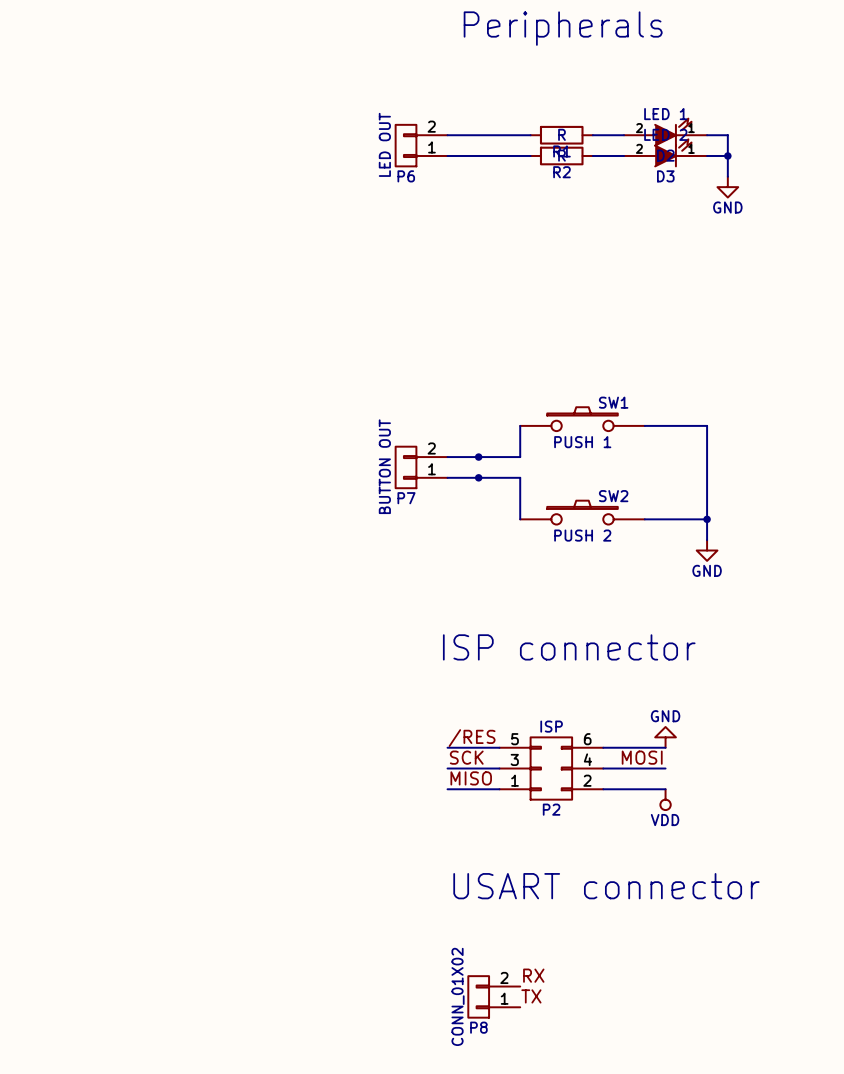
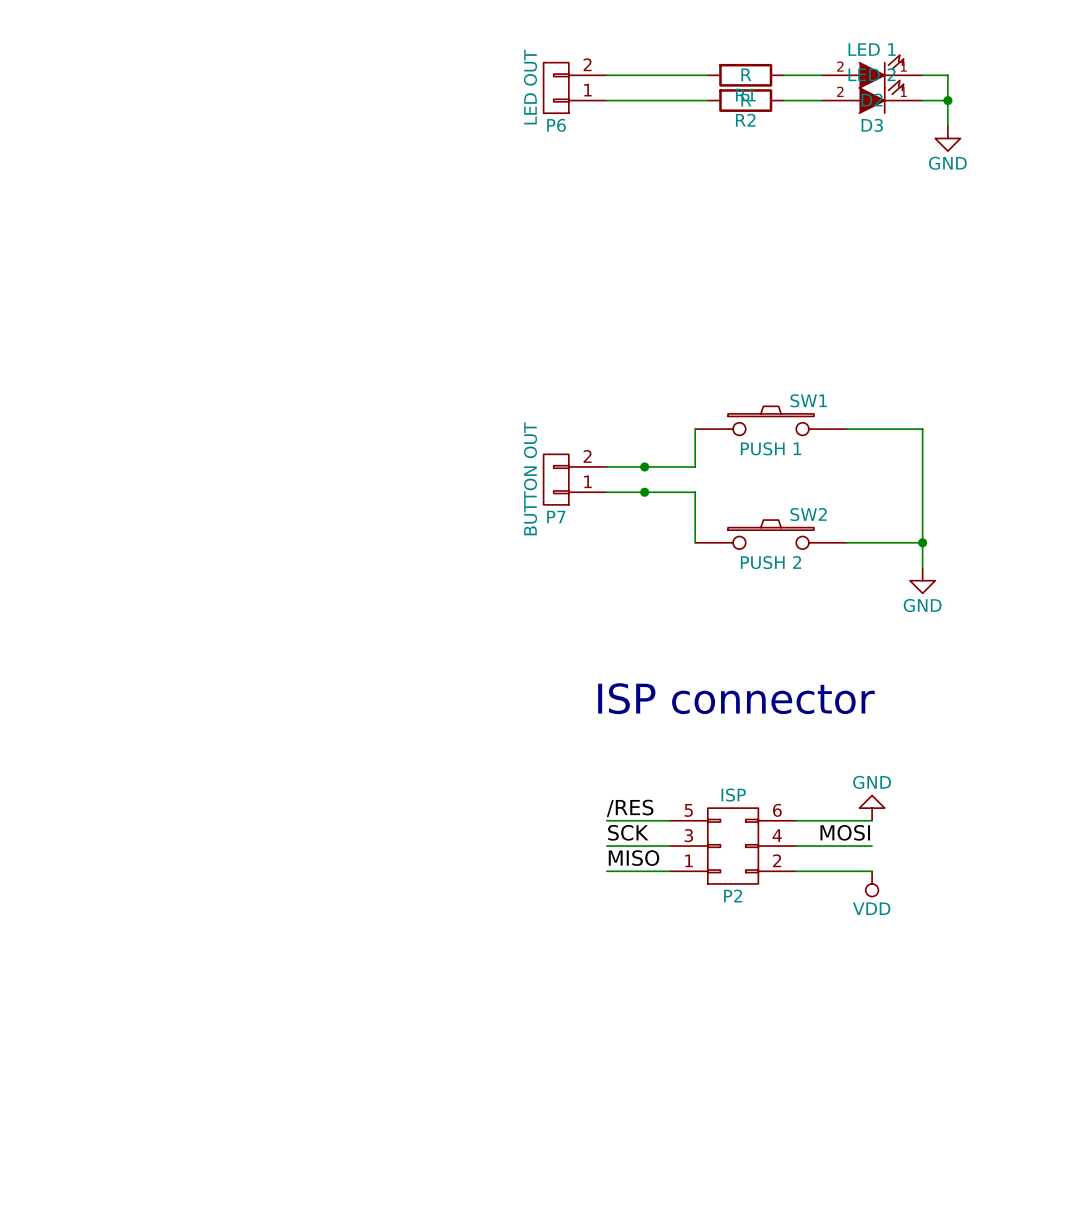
text: USART connector (606, 886) -> none
label: RX (533, 975) -> none
P8: CONN_01X02 (494, 996) -> none
label: TX (531, 996) -> none

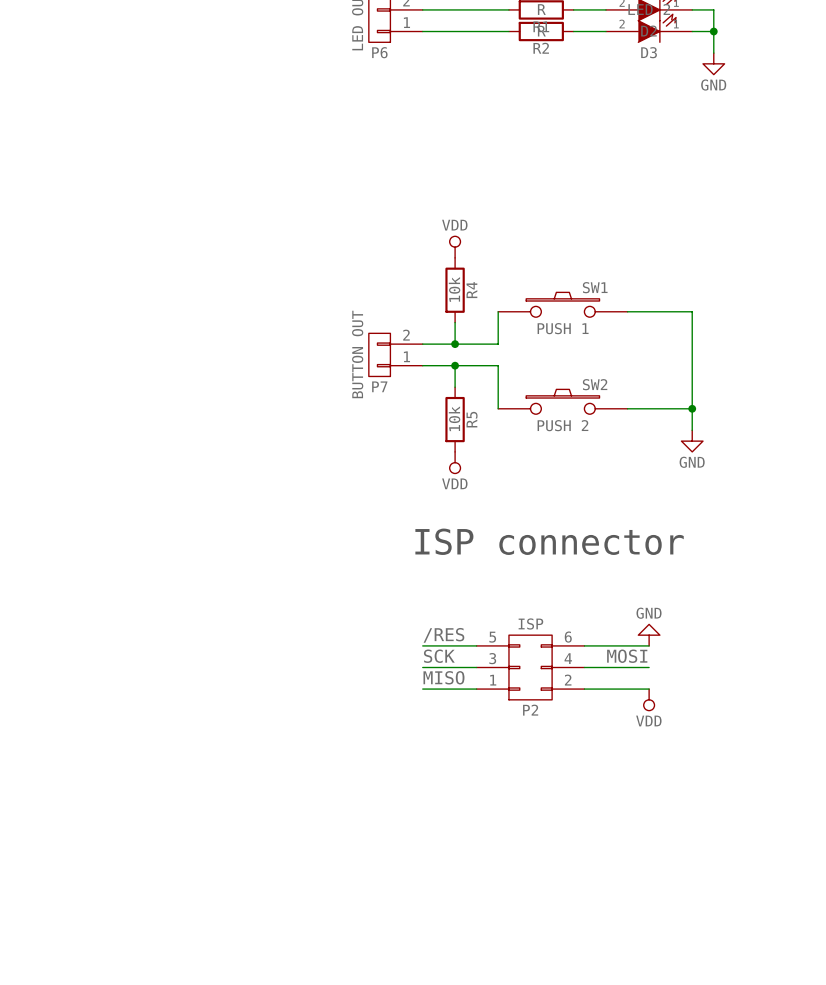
power symbol: none -> VDD (455, 247)
R4: none -> 10k (455, 290)
wire: none -> (455, 322) (455, 344)
wire: none -> (455, 365) (455, 387)
R5: none -> 10k (455, 419)
power symbol: none -> VDD (455, 462)

